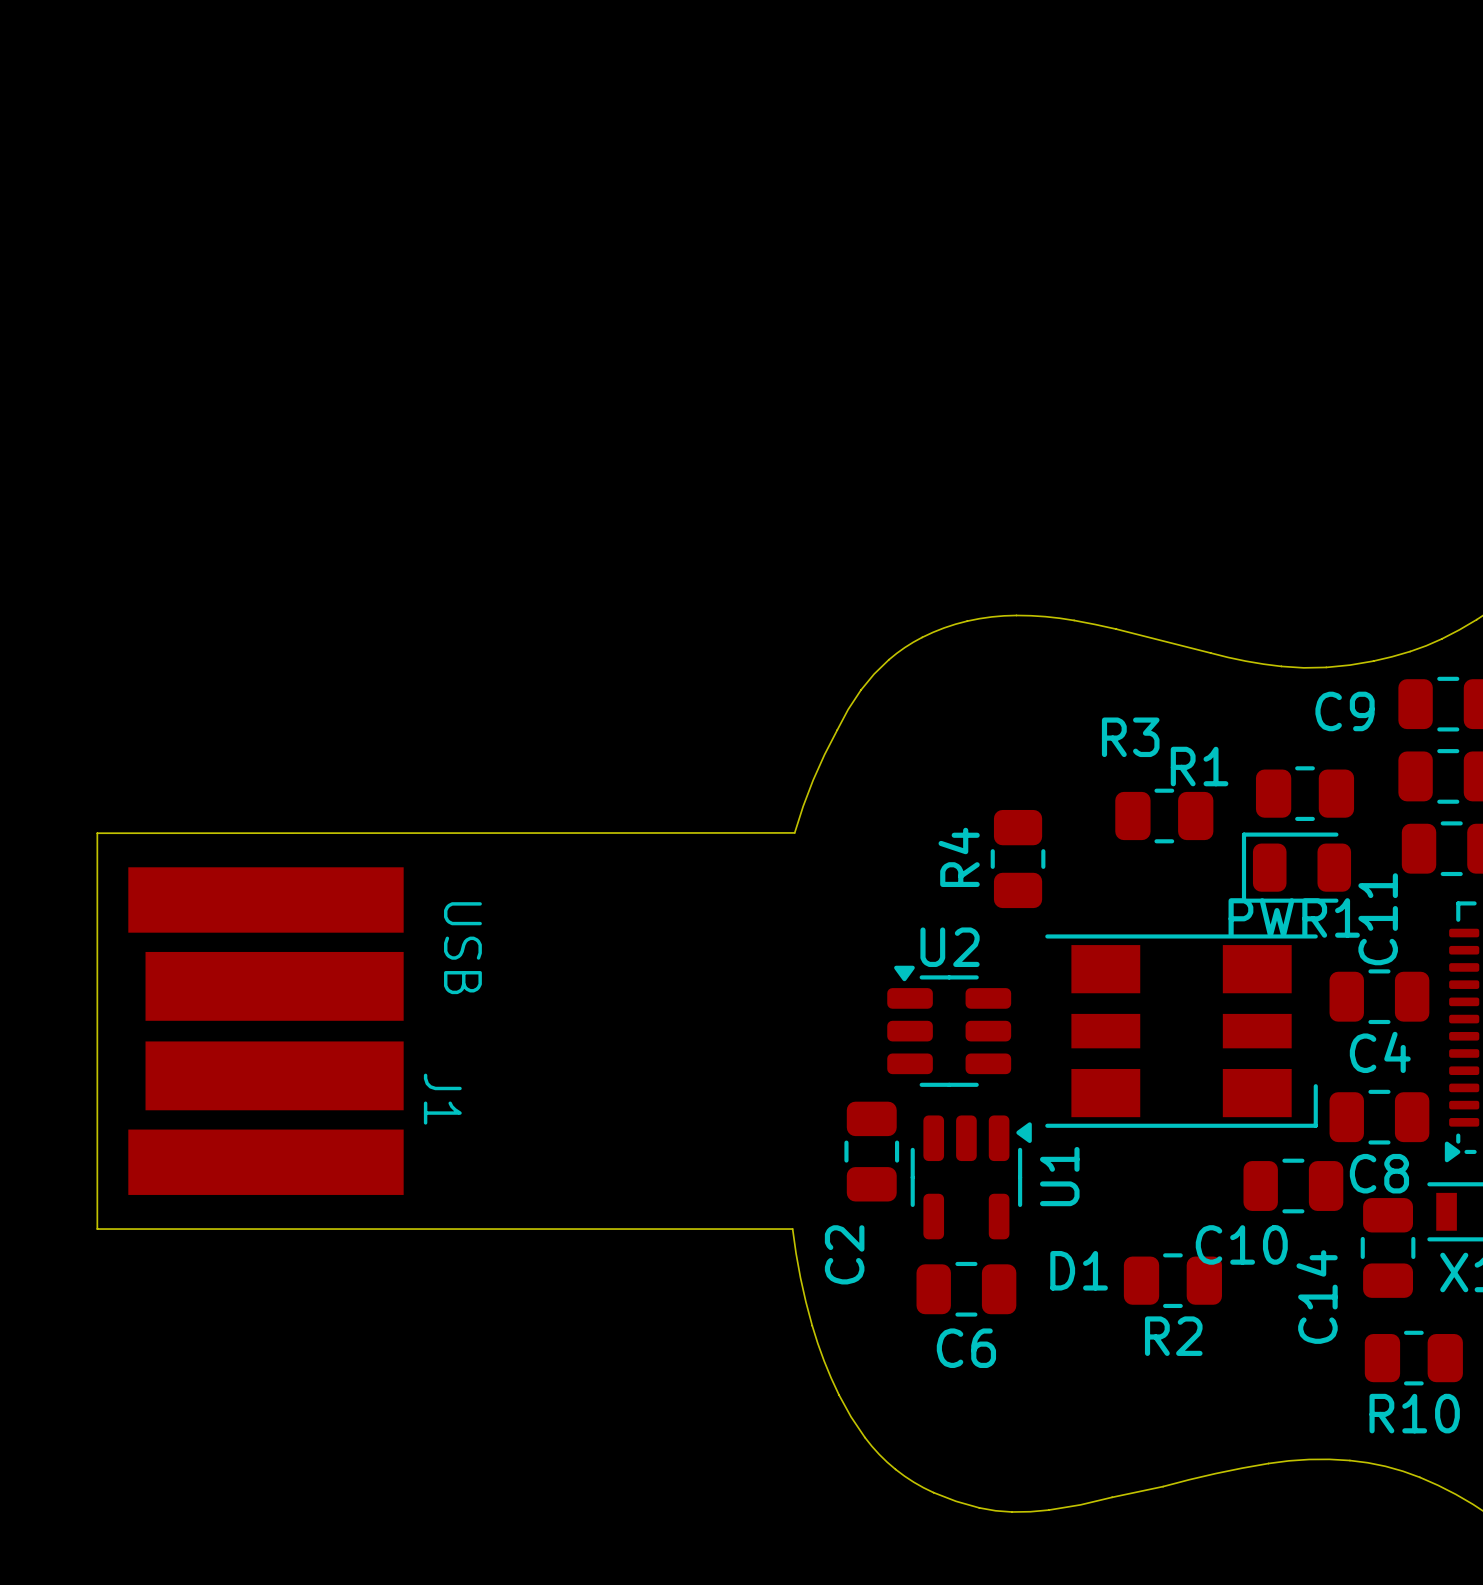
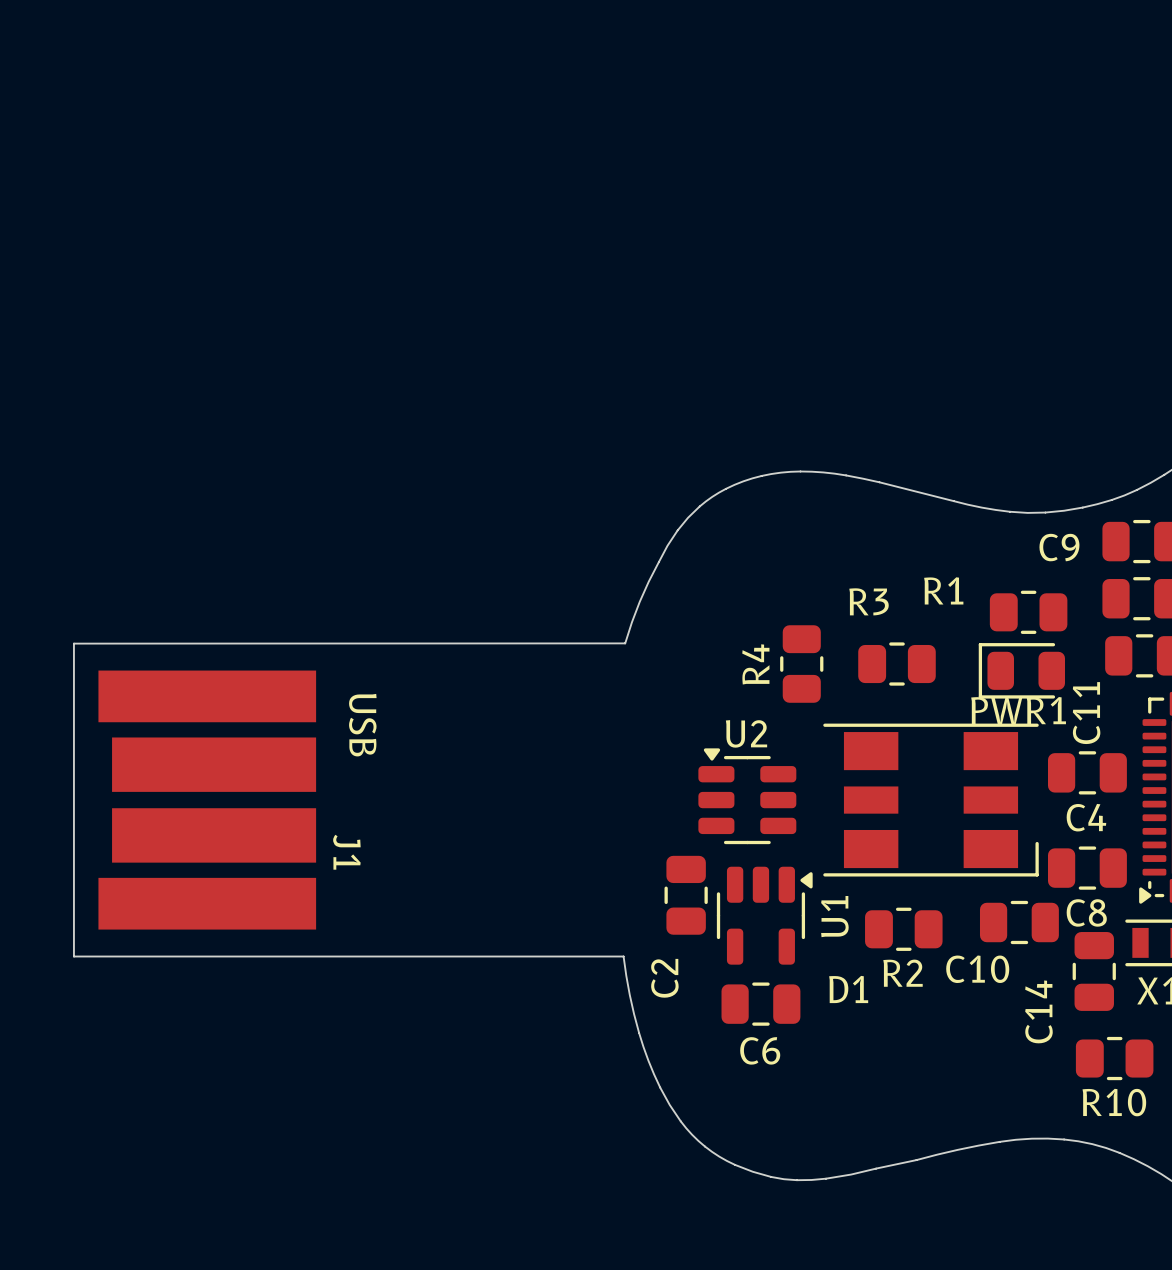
R3 position: (1164, 816) -> (896, 664)
R2 position: (1172, 1280) -> (903, 929)

